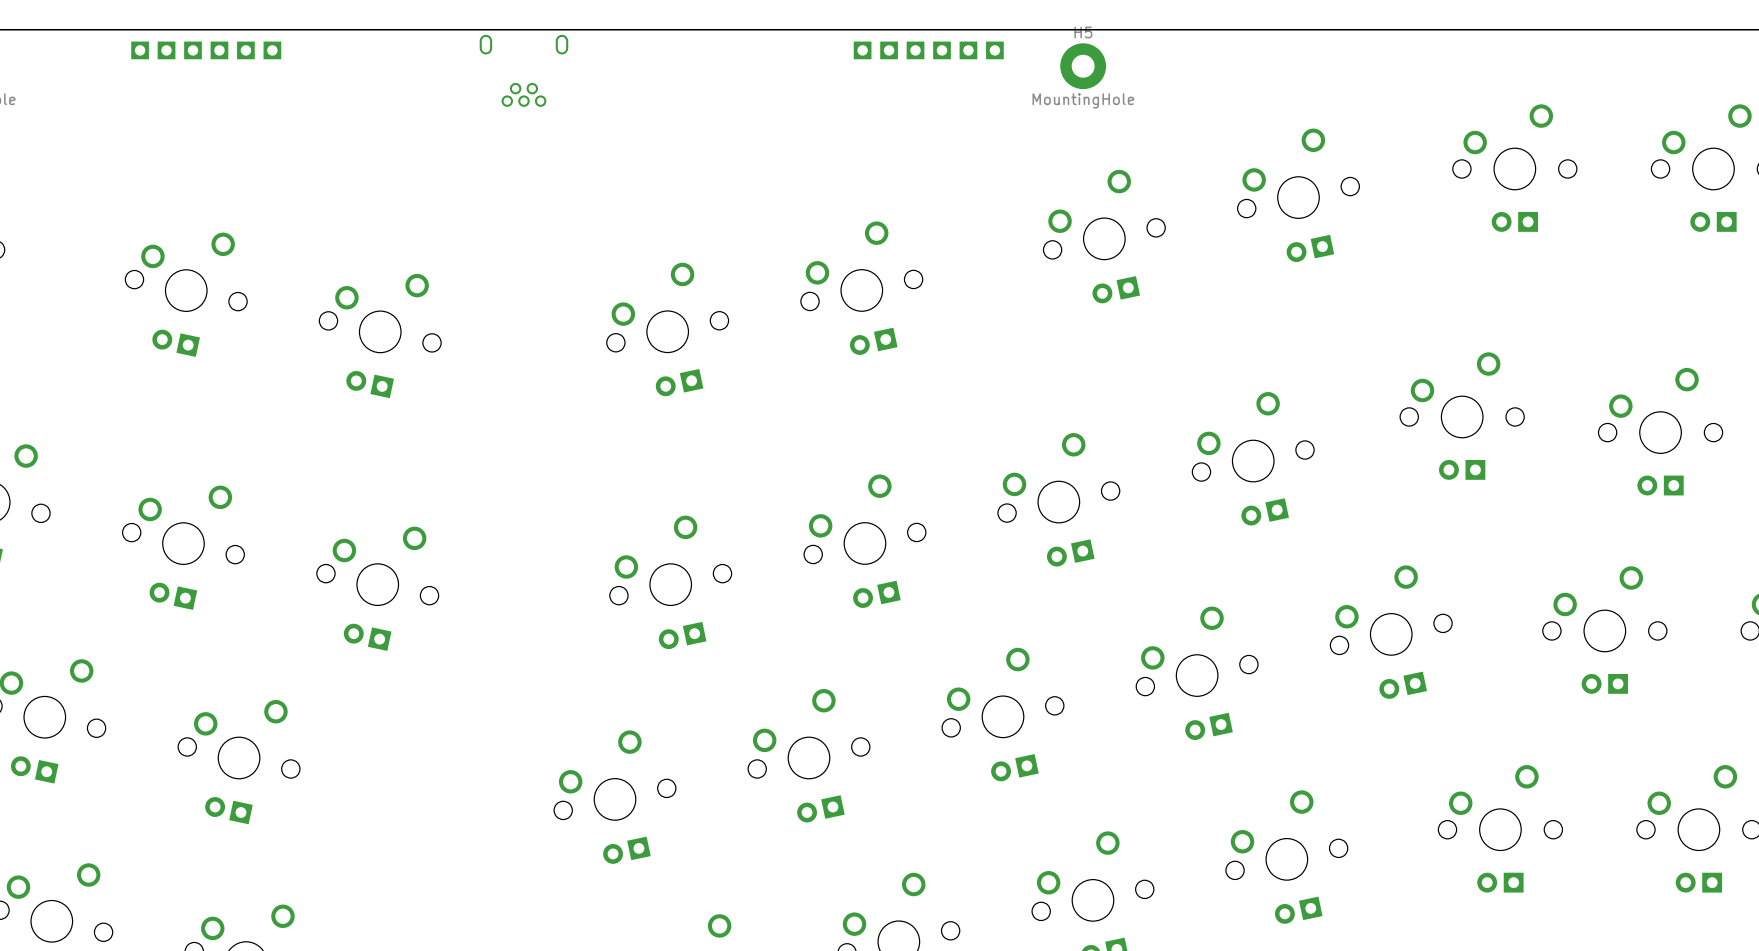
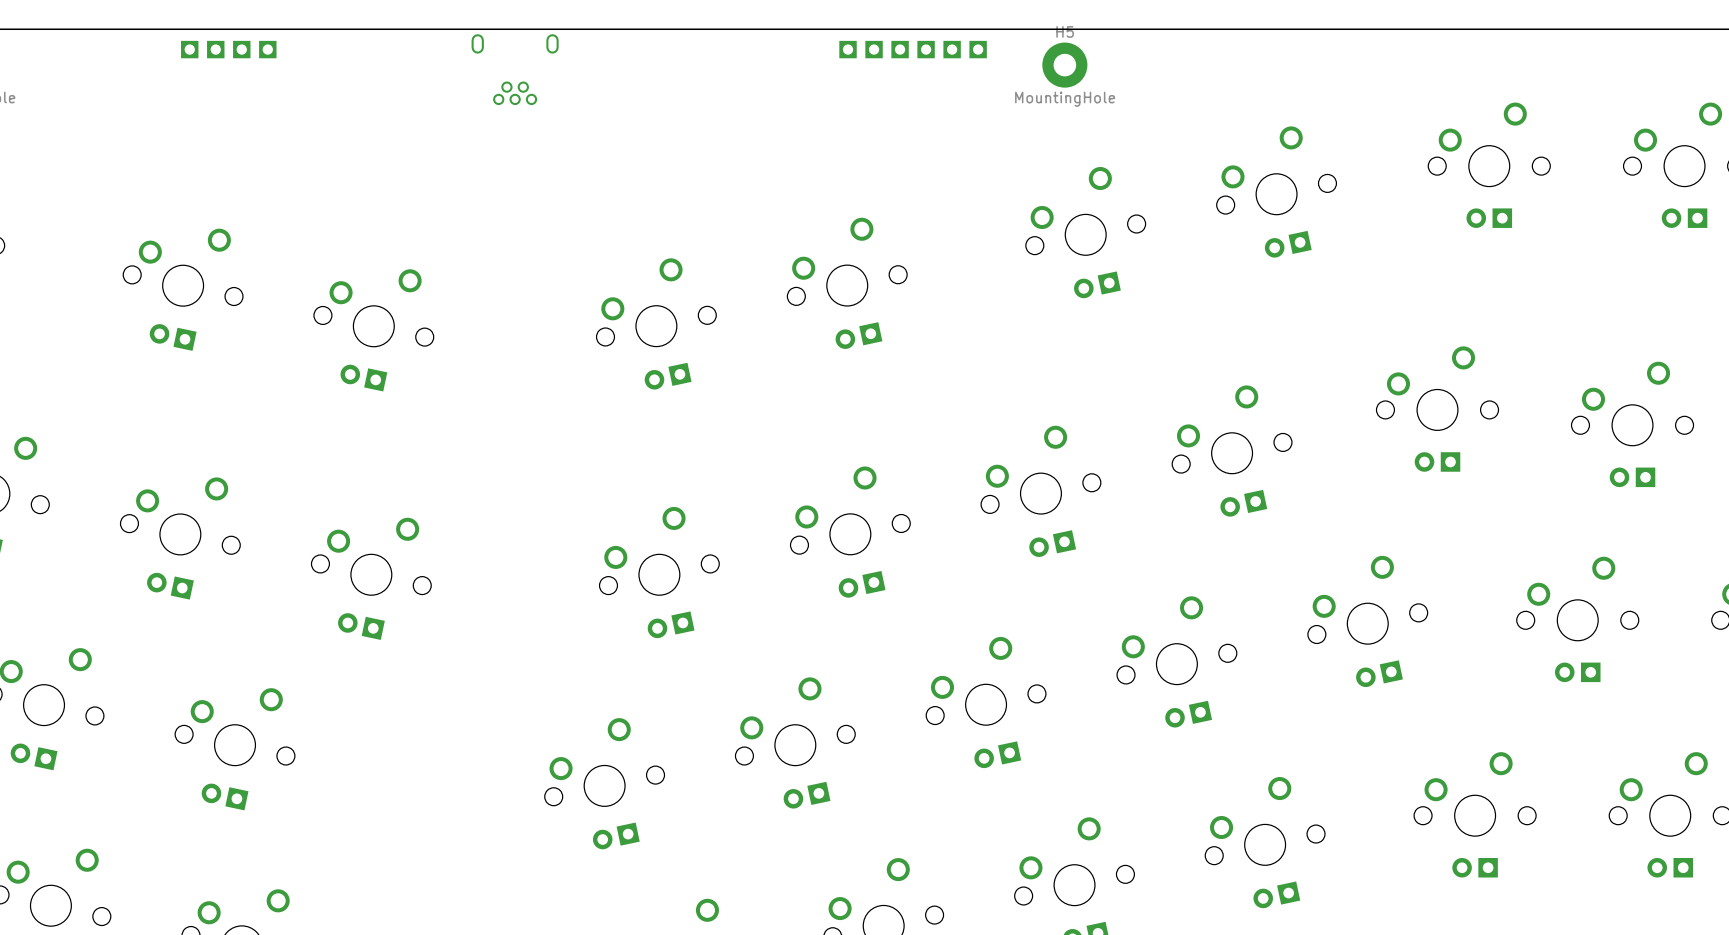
part: (140, 50) -> none
part: (166, 50) -> none

